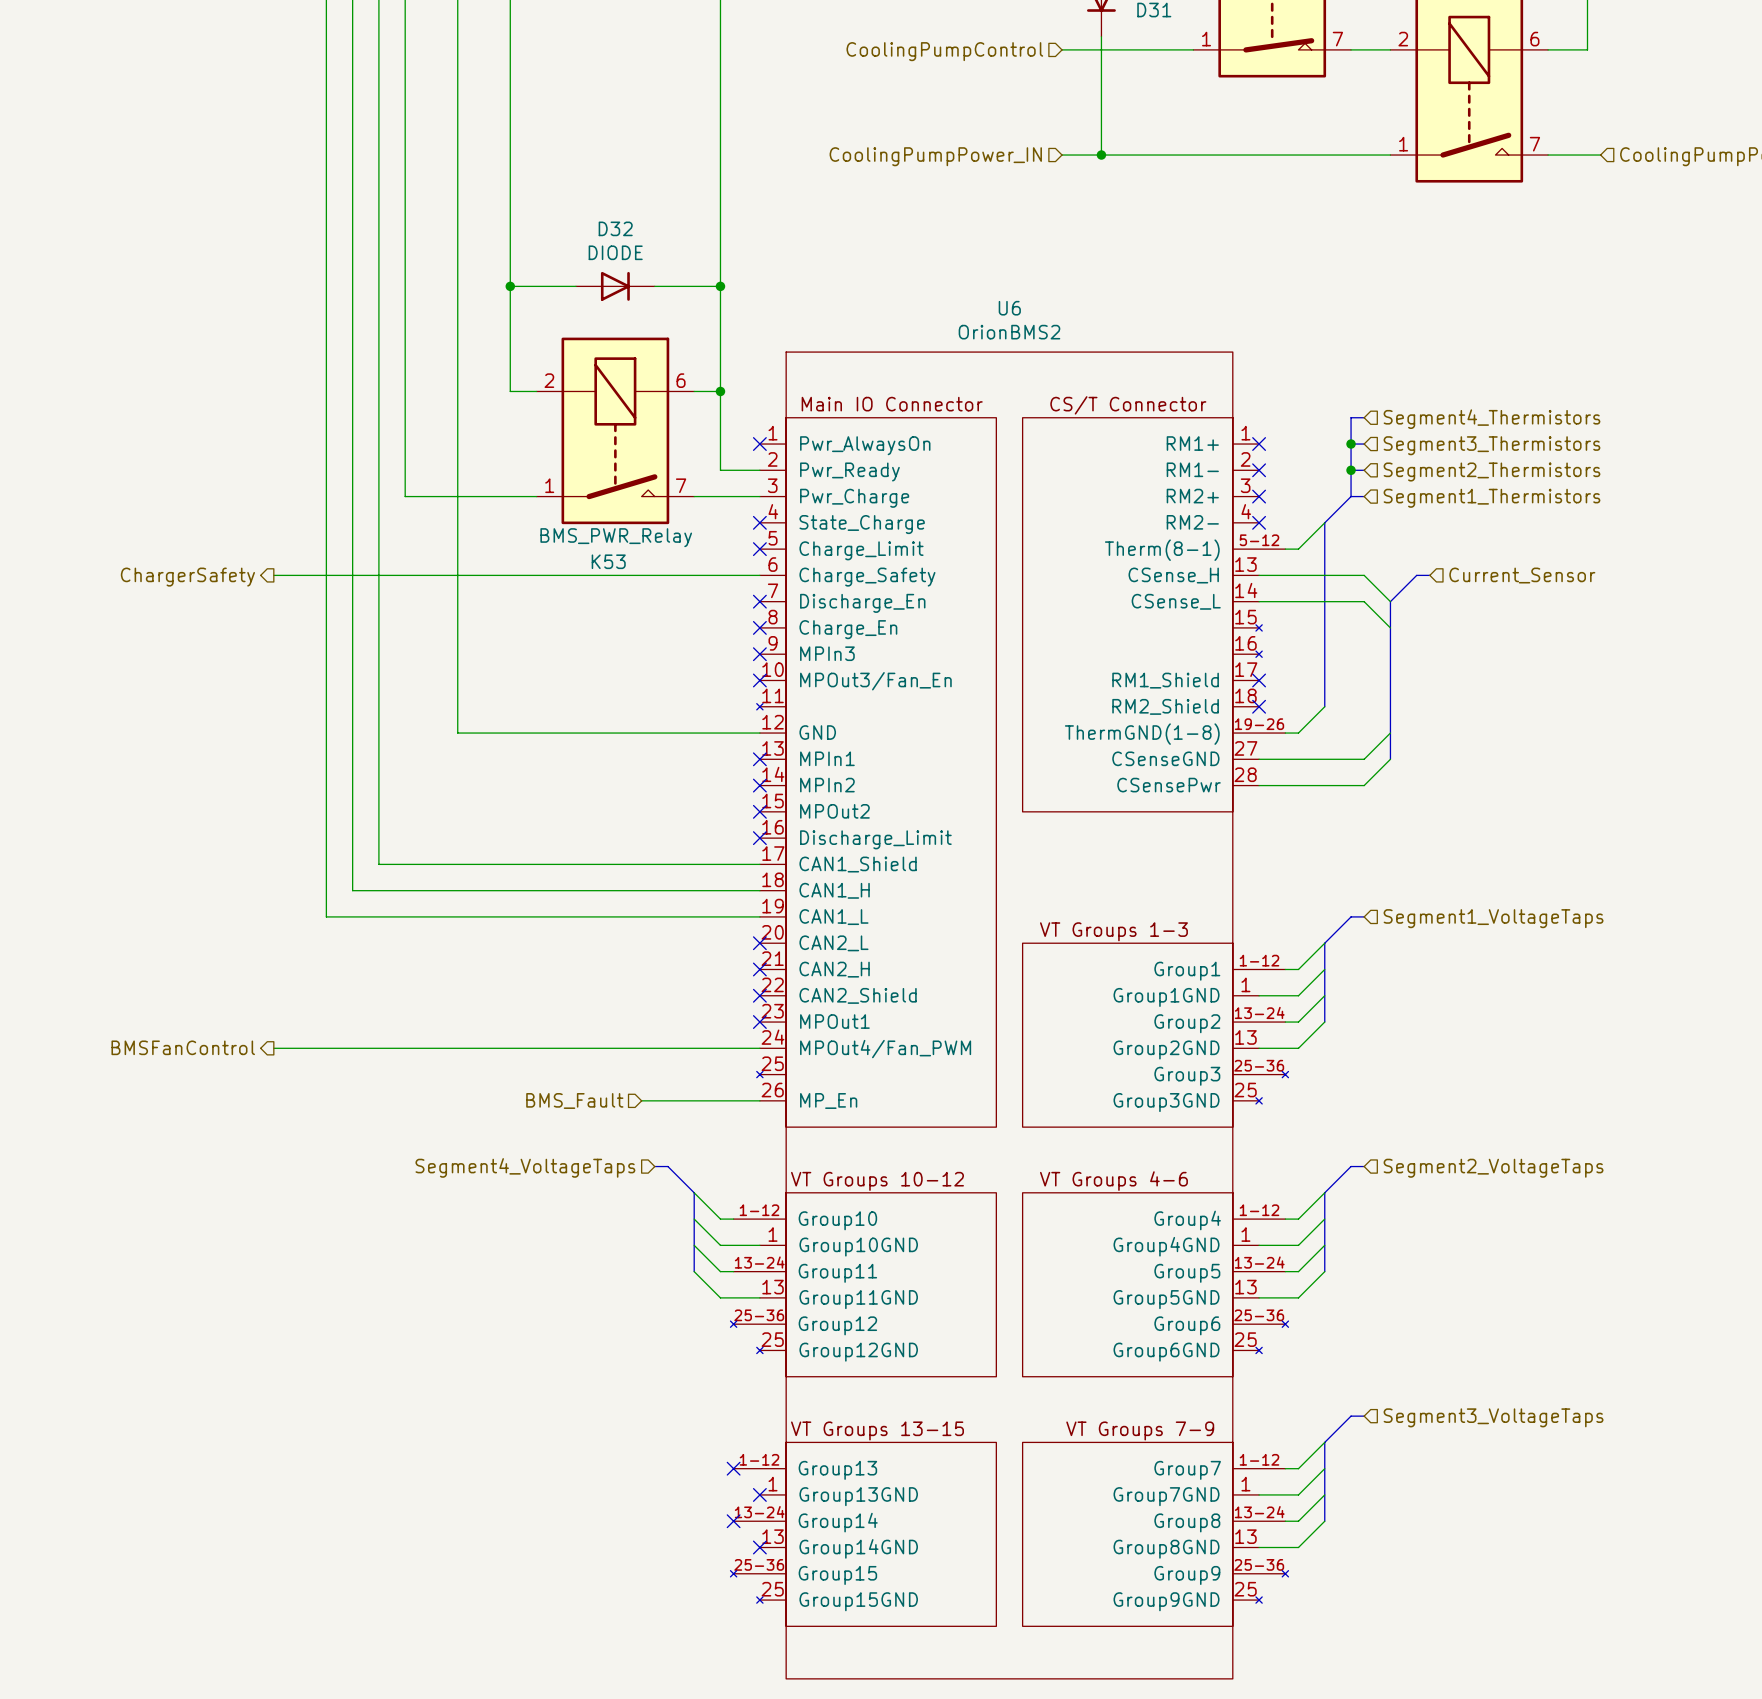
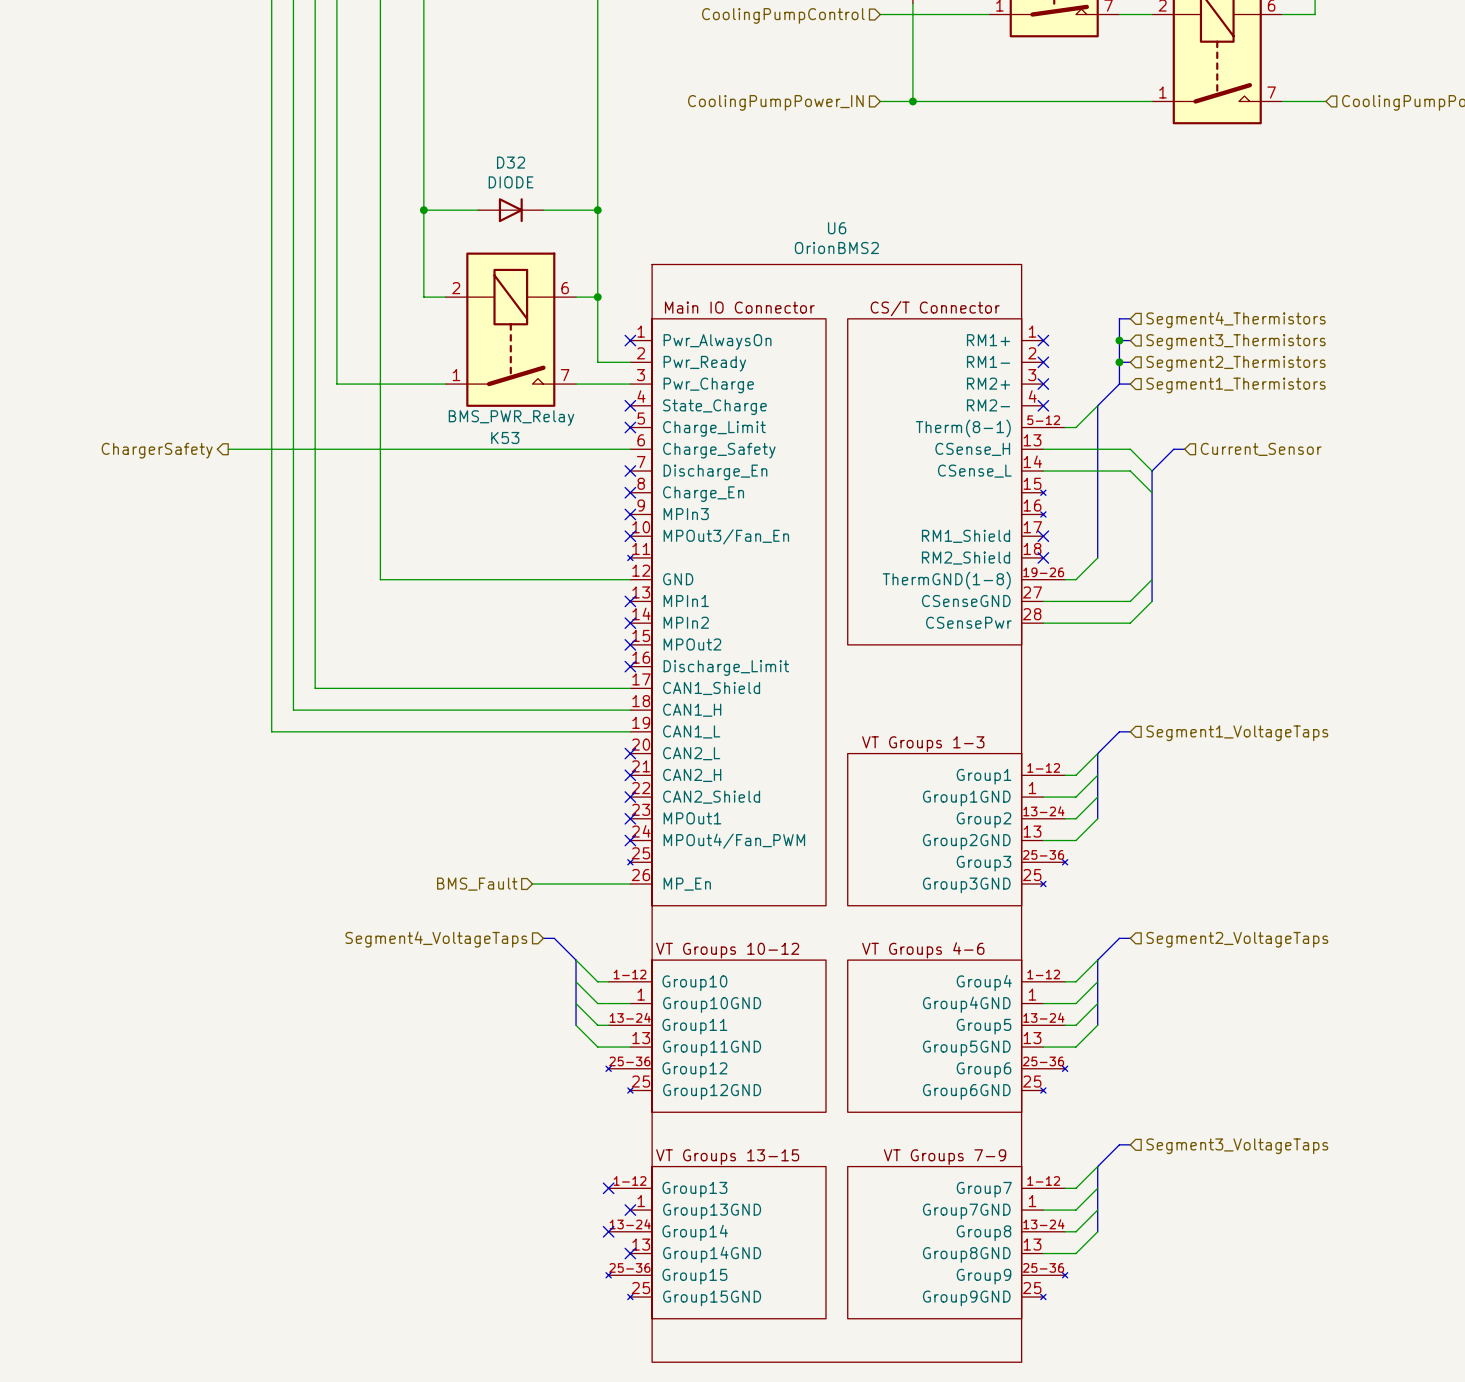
hierarchical label: BMSFanControl (183, 1047) -> none
wire: (273, 1048) (759, 1048) -> none
no-connect mark: none -> (630, 840)

